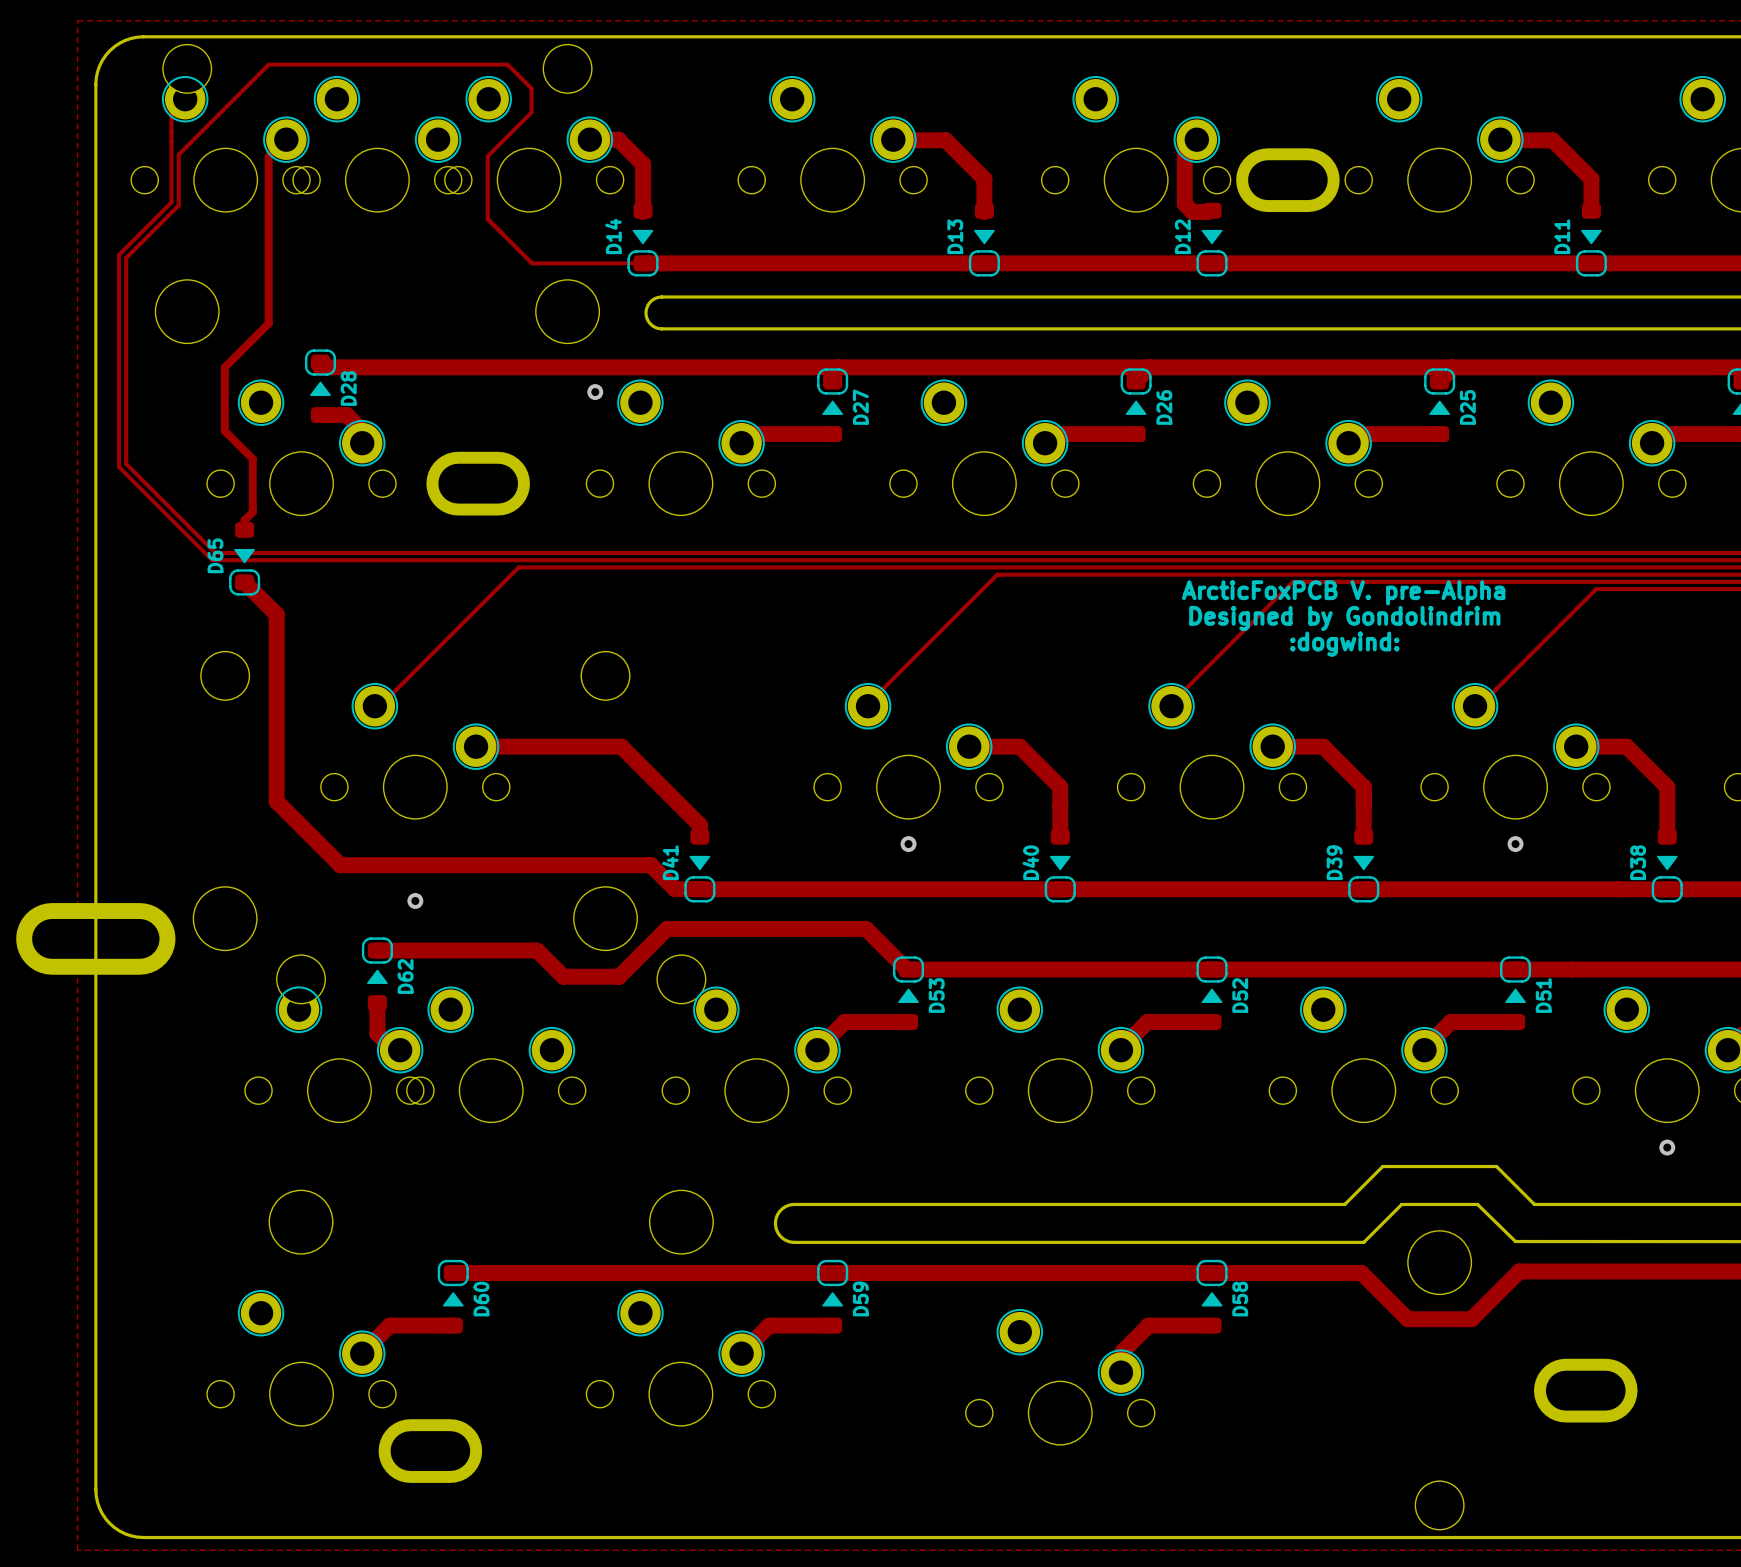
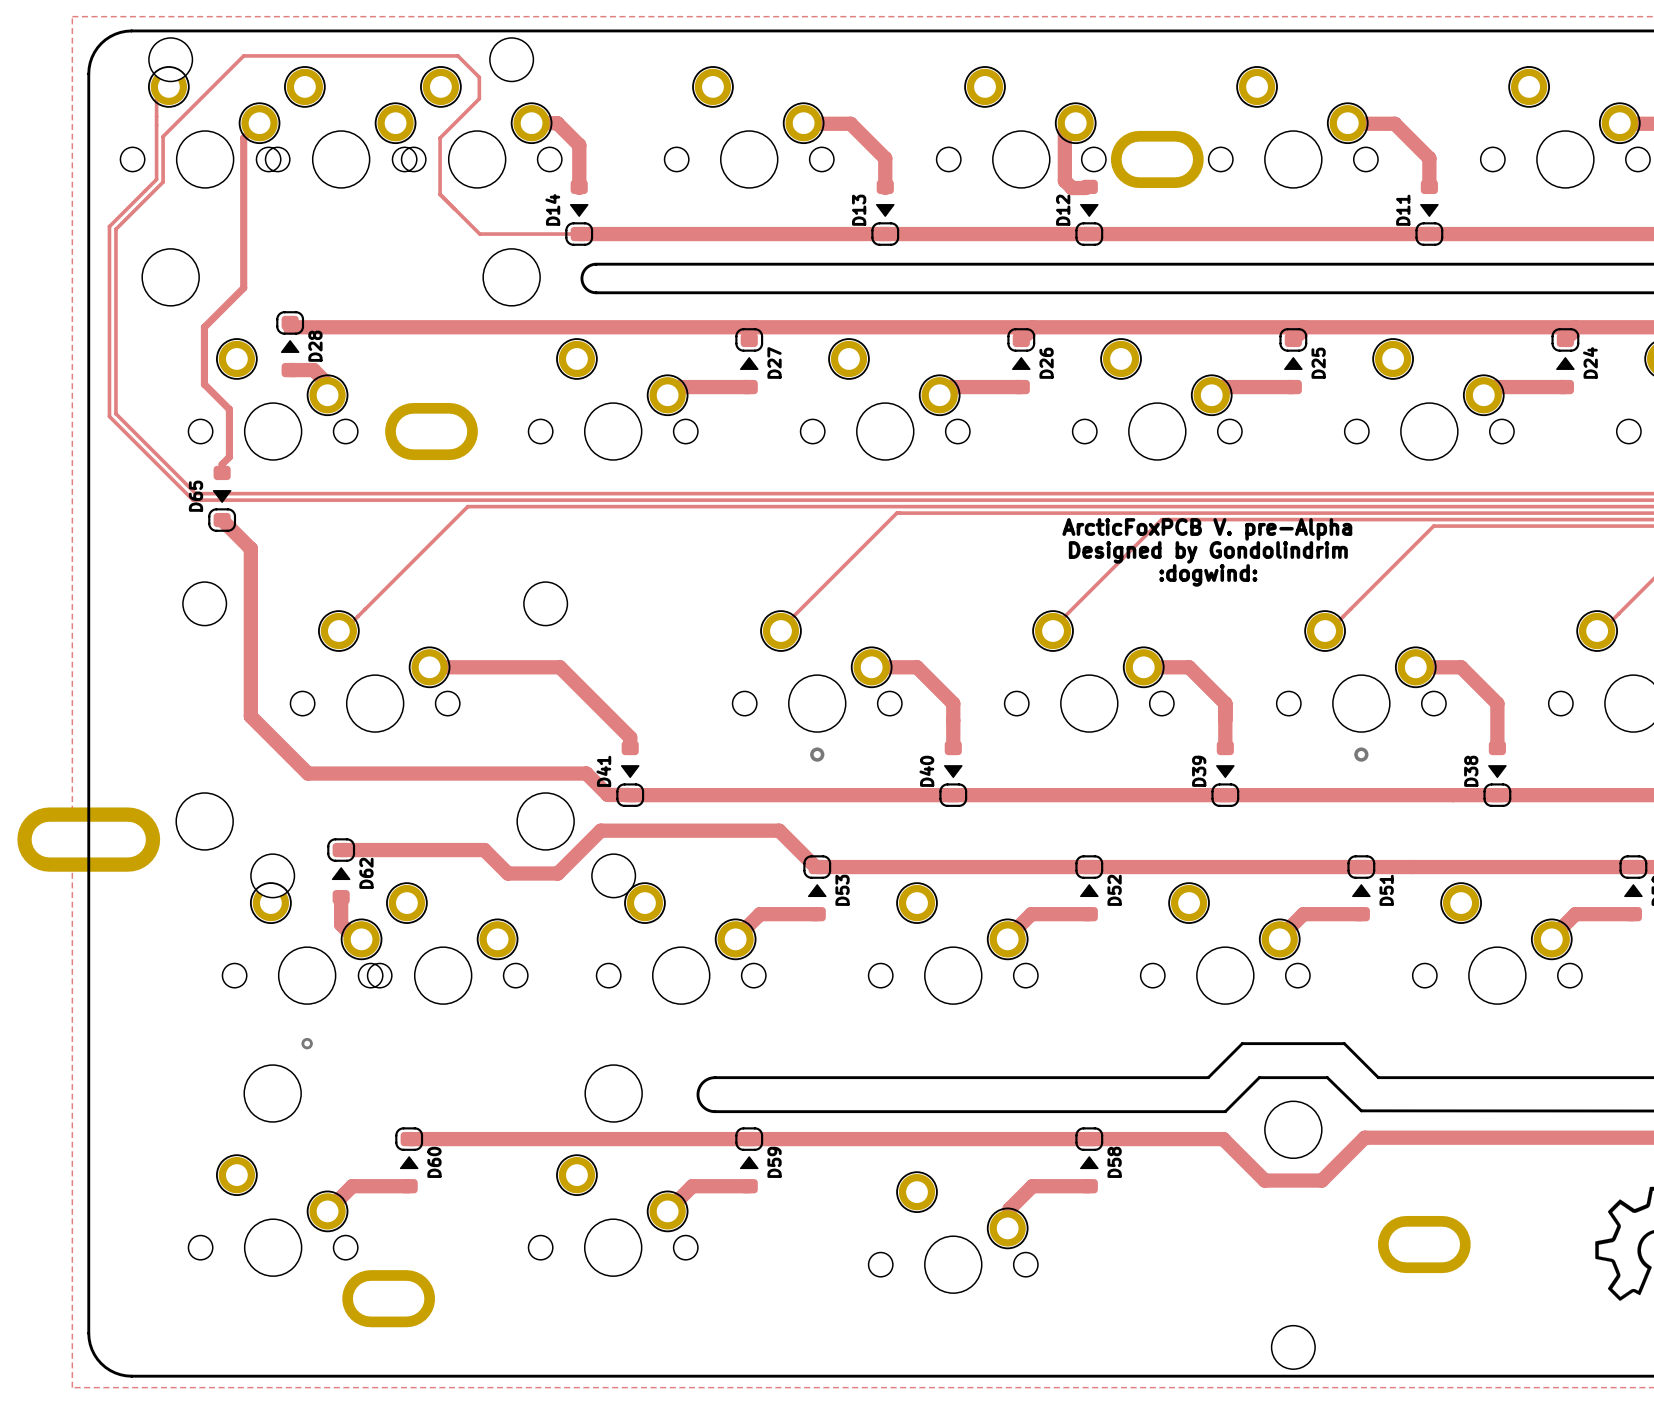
via: (595, 392) -> none
via: (415, 900) -> none
via: (1667, 1147) -> none
via: none -> (307, 1043)

